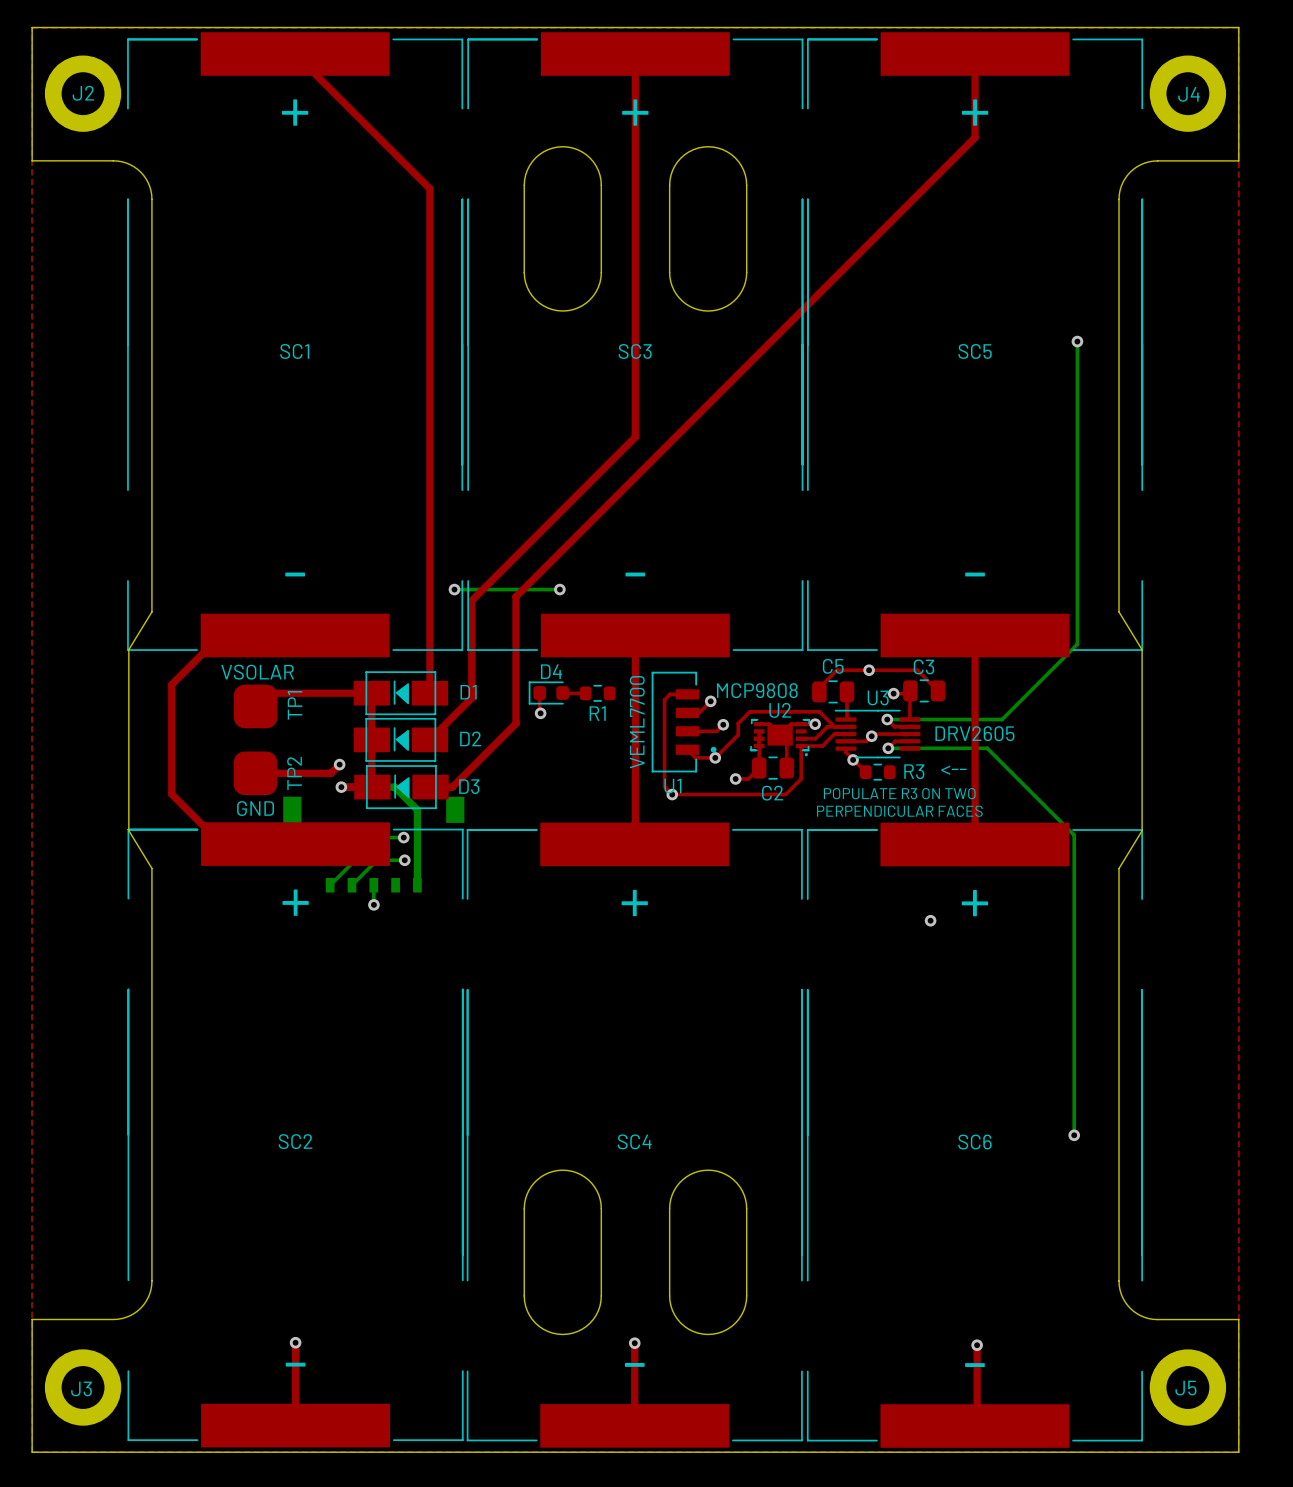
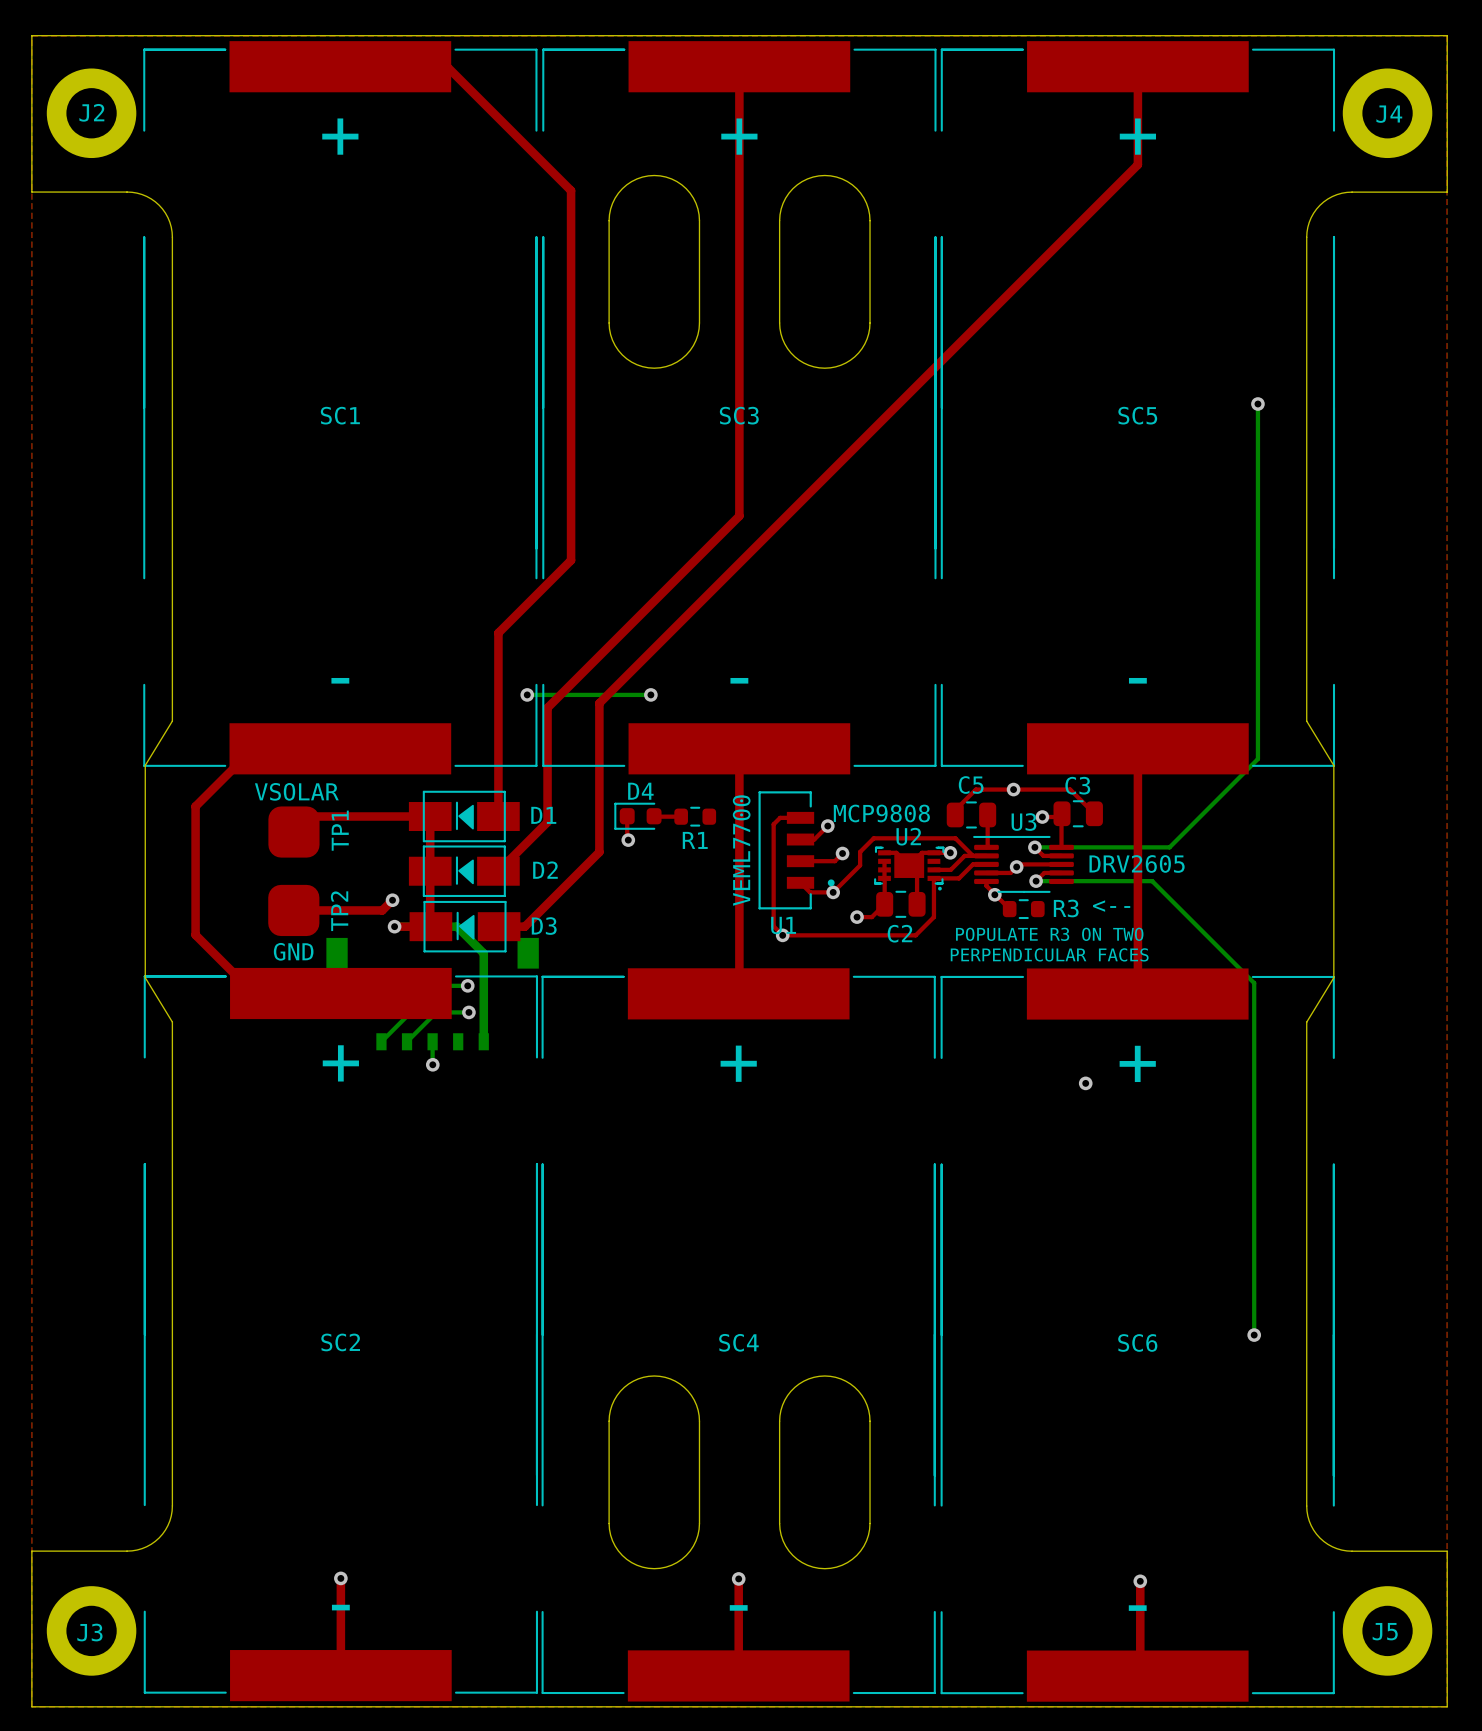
top track: (295, 53) (429, 188) (429, 536) -> (340, 66) (447, 66) (571, 190) (571, 560) (498, 633)

